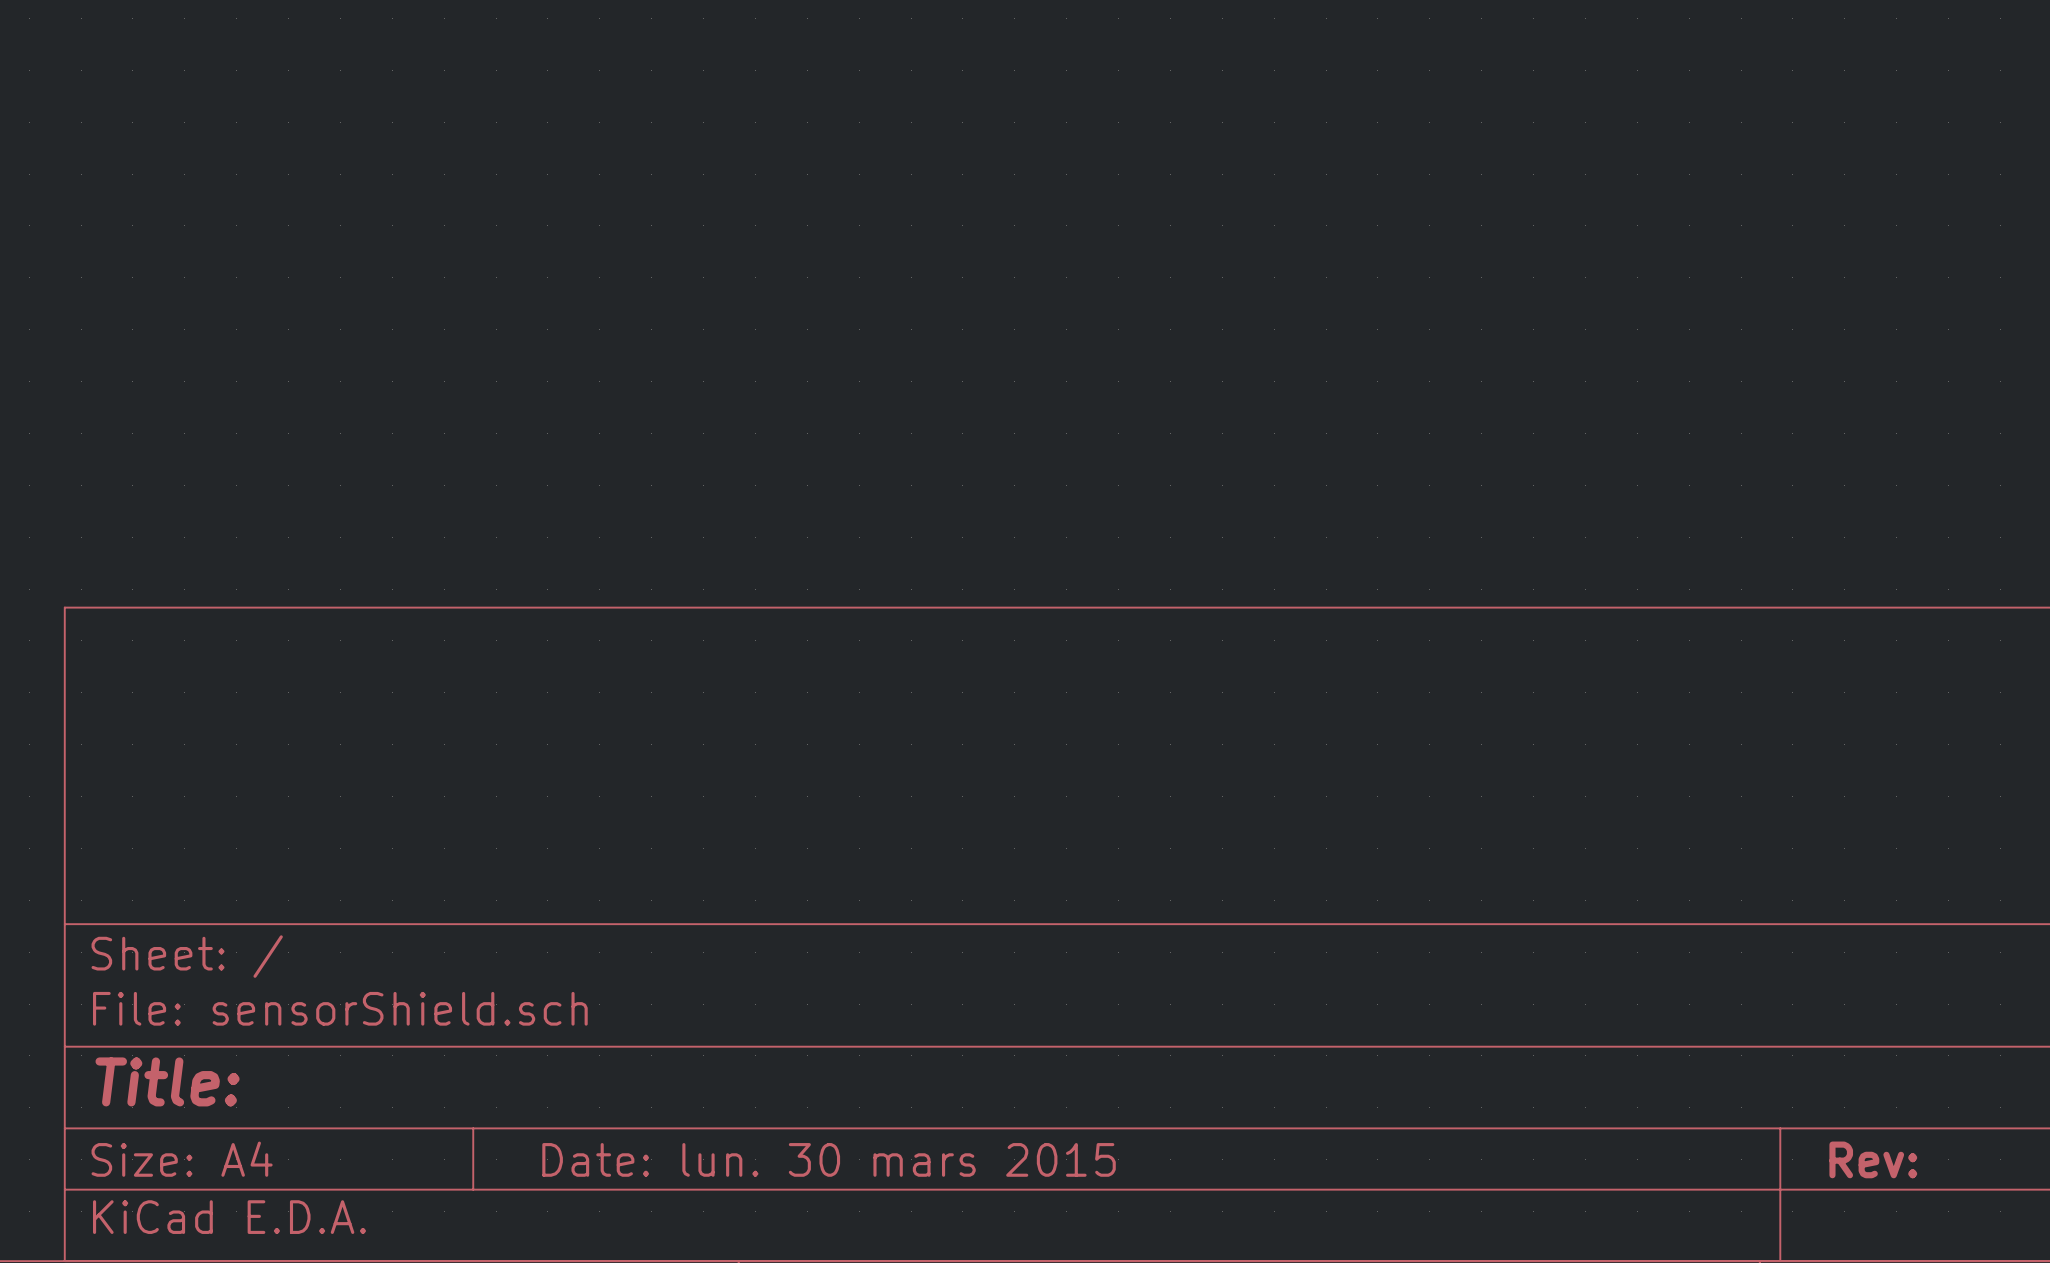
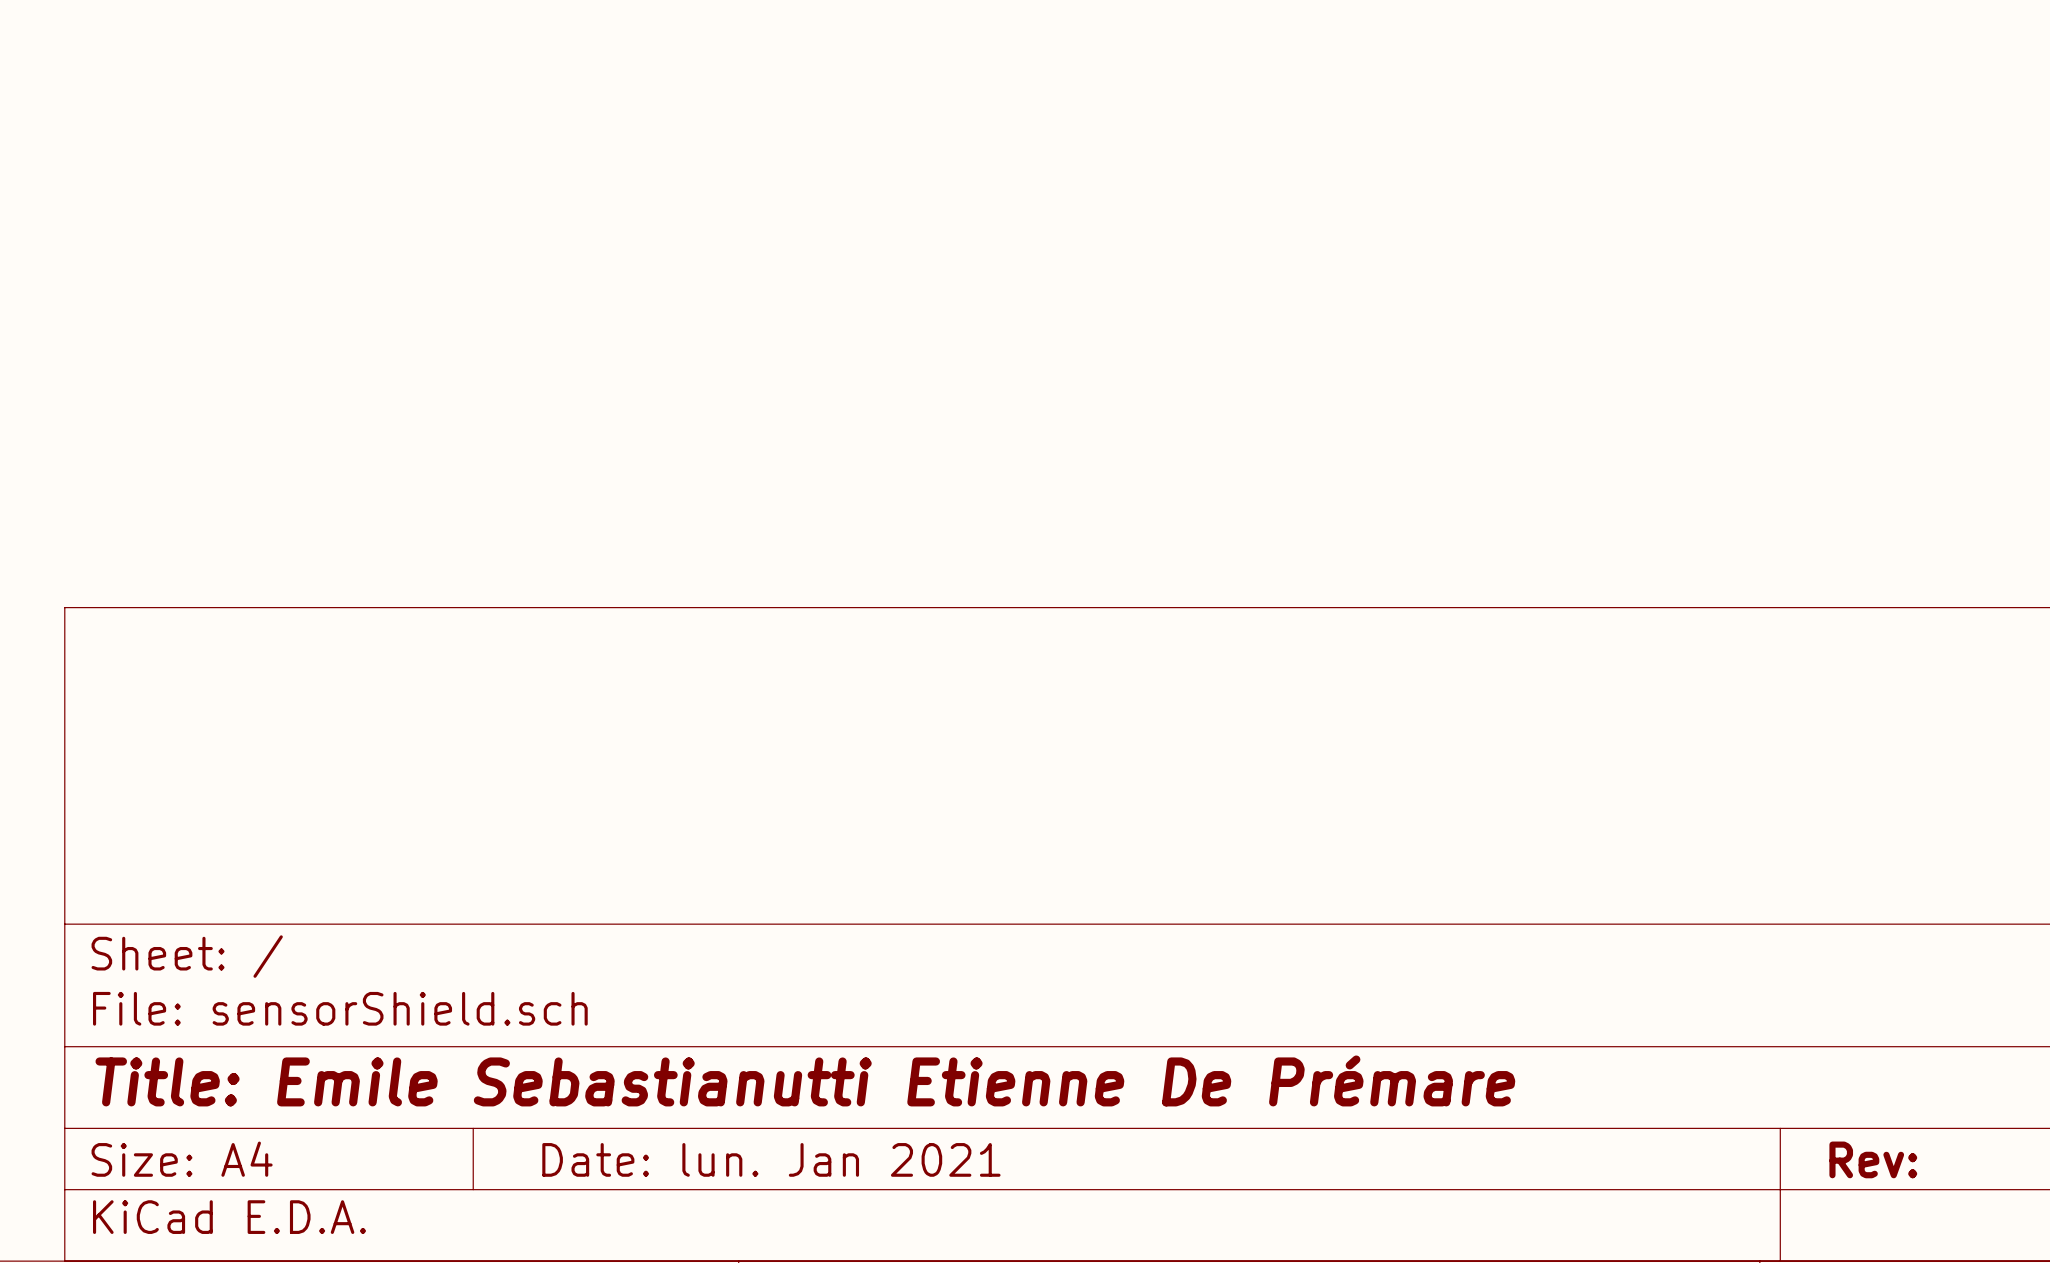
title block: Title: (167, 1081) -> Title: Emile Sebastianutti Etienne De Prémare (805, 1080)
title block: Date: lun. 30 mars 2015 (829, 1159) -> Date: lun. Jan 2021 (771, 1159)

